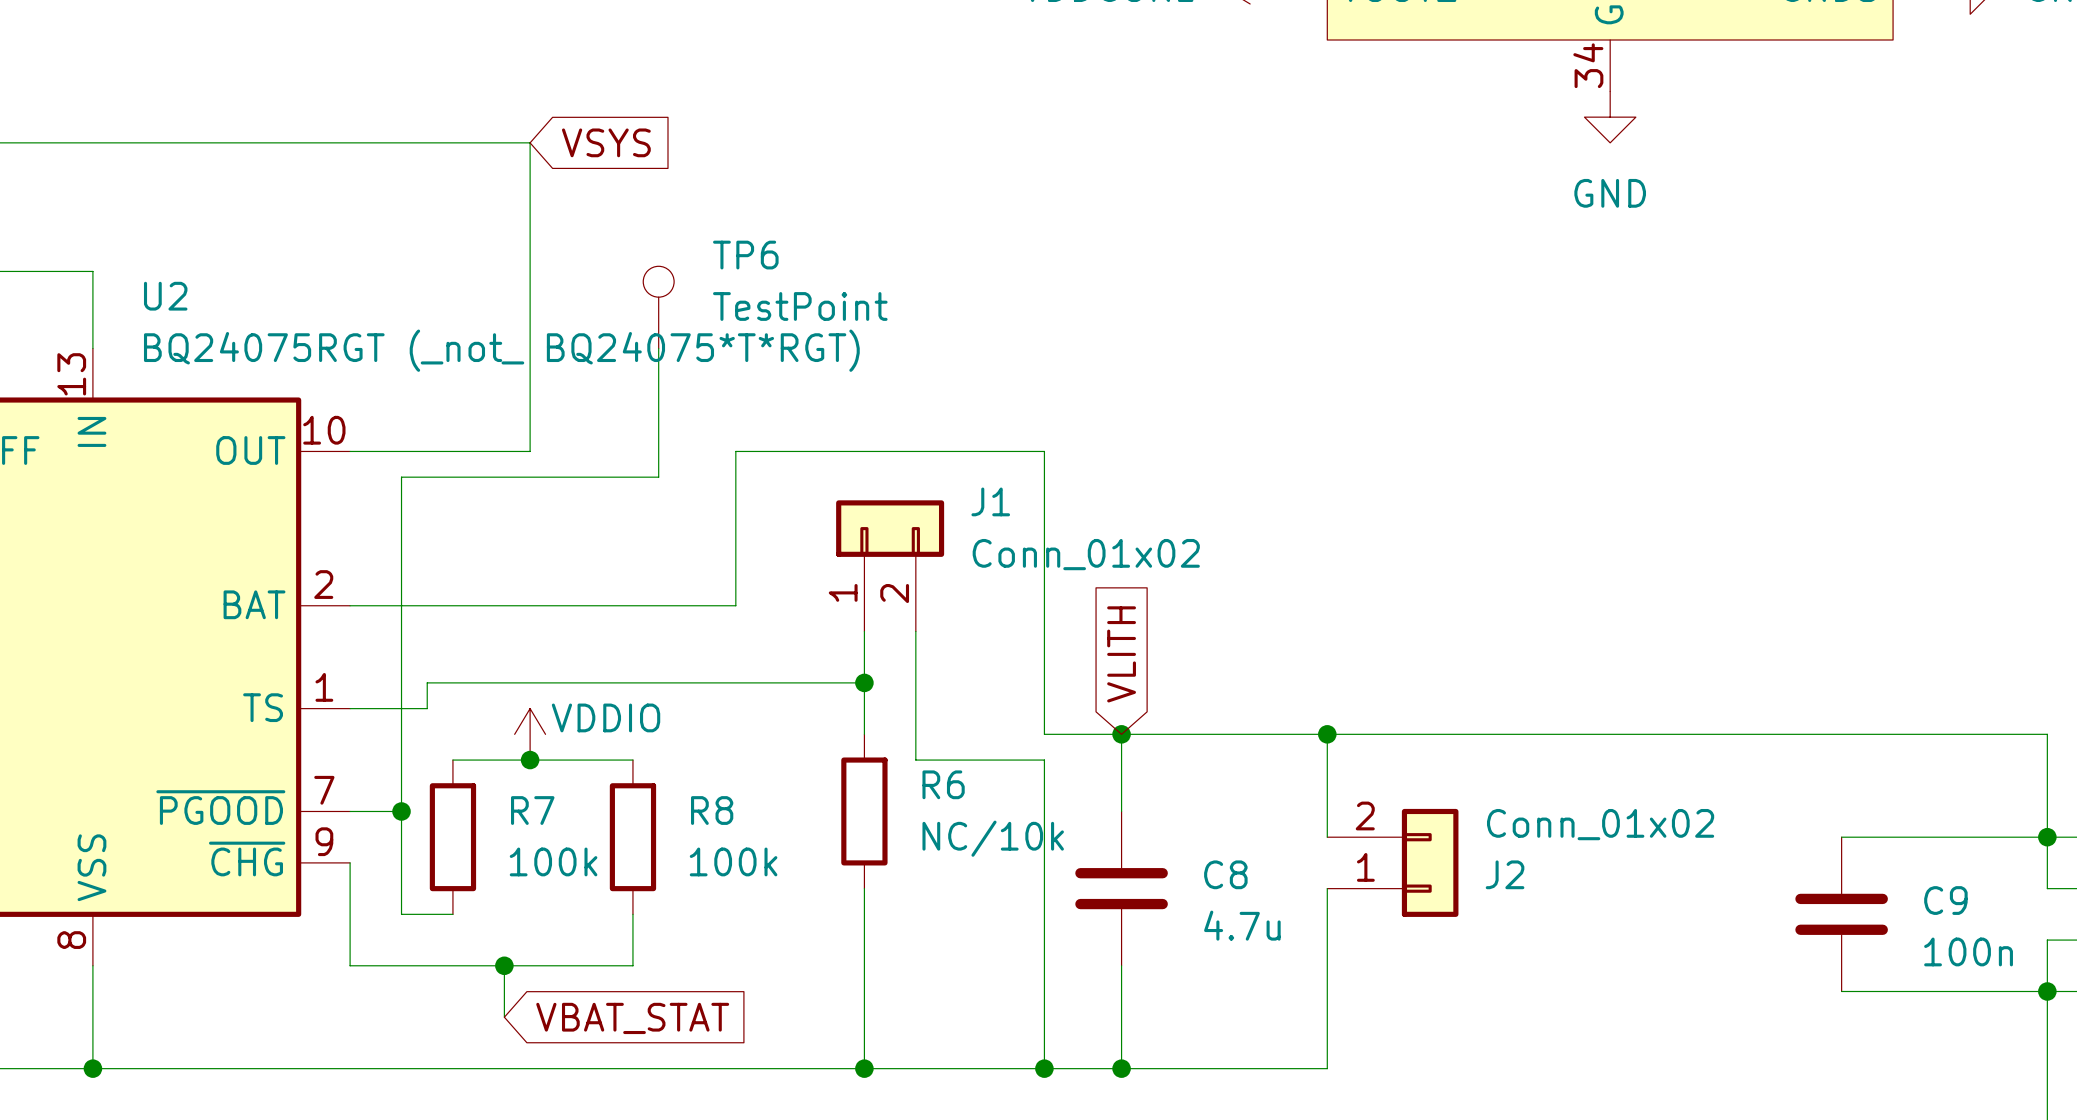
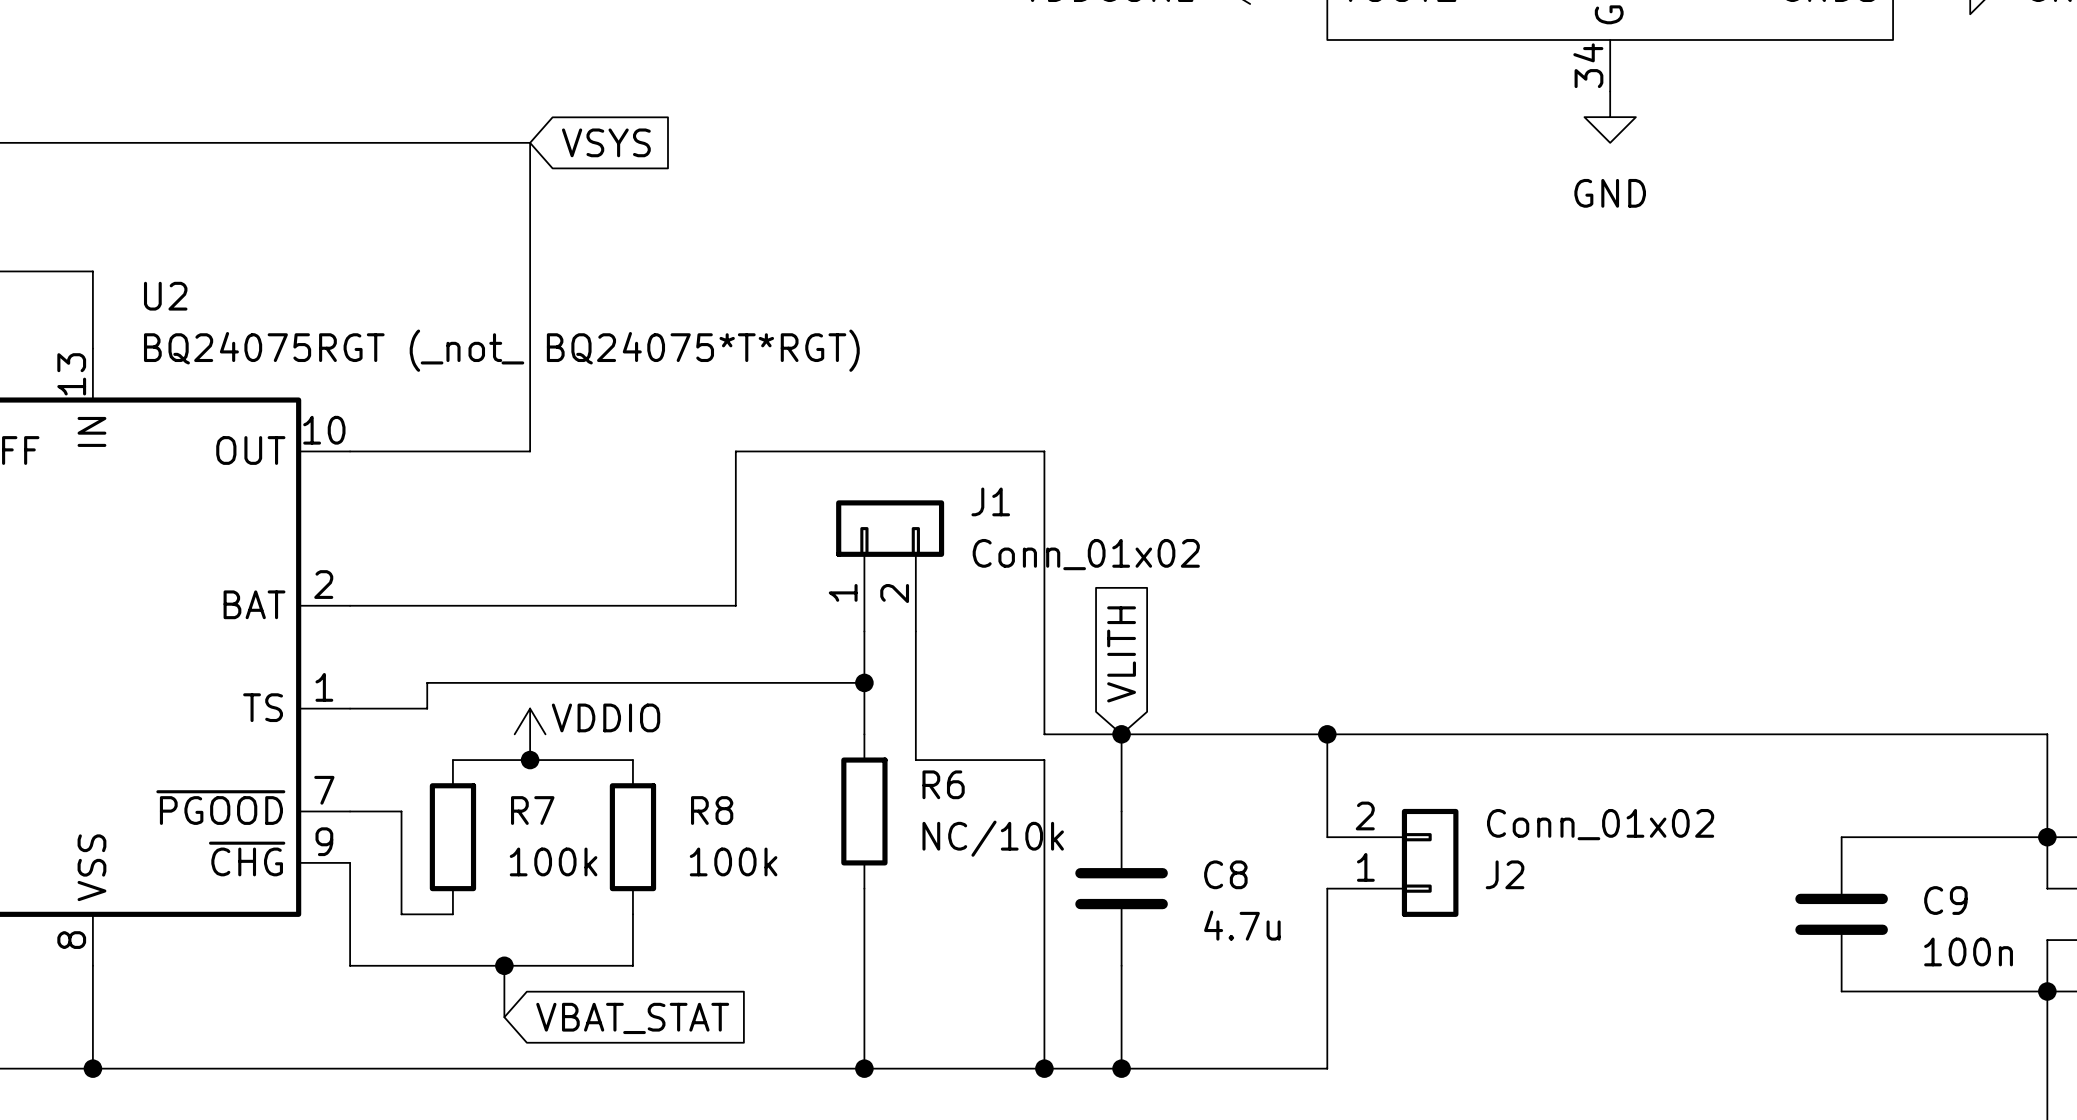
TP6: TestPoint (658, 307) -> none
wire: (658, 348) (658, 477) (401, 477) (401, 811) -> none
junction: (401, 811) -> none

